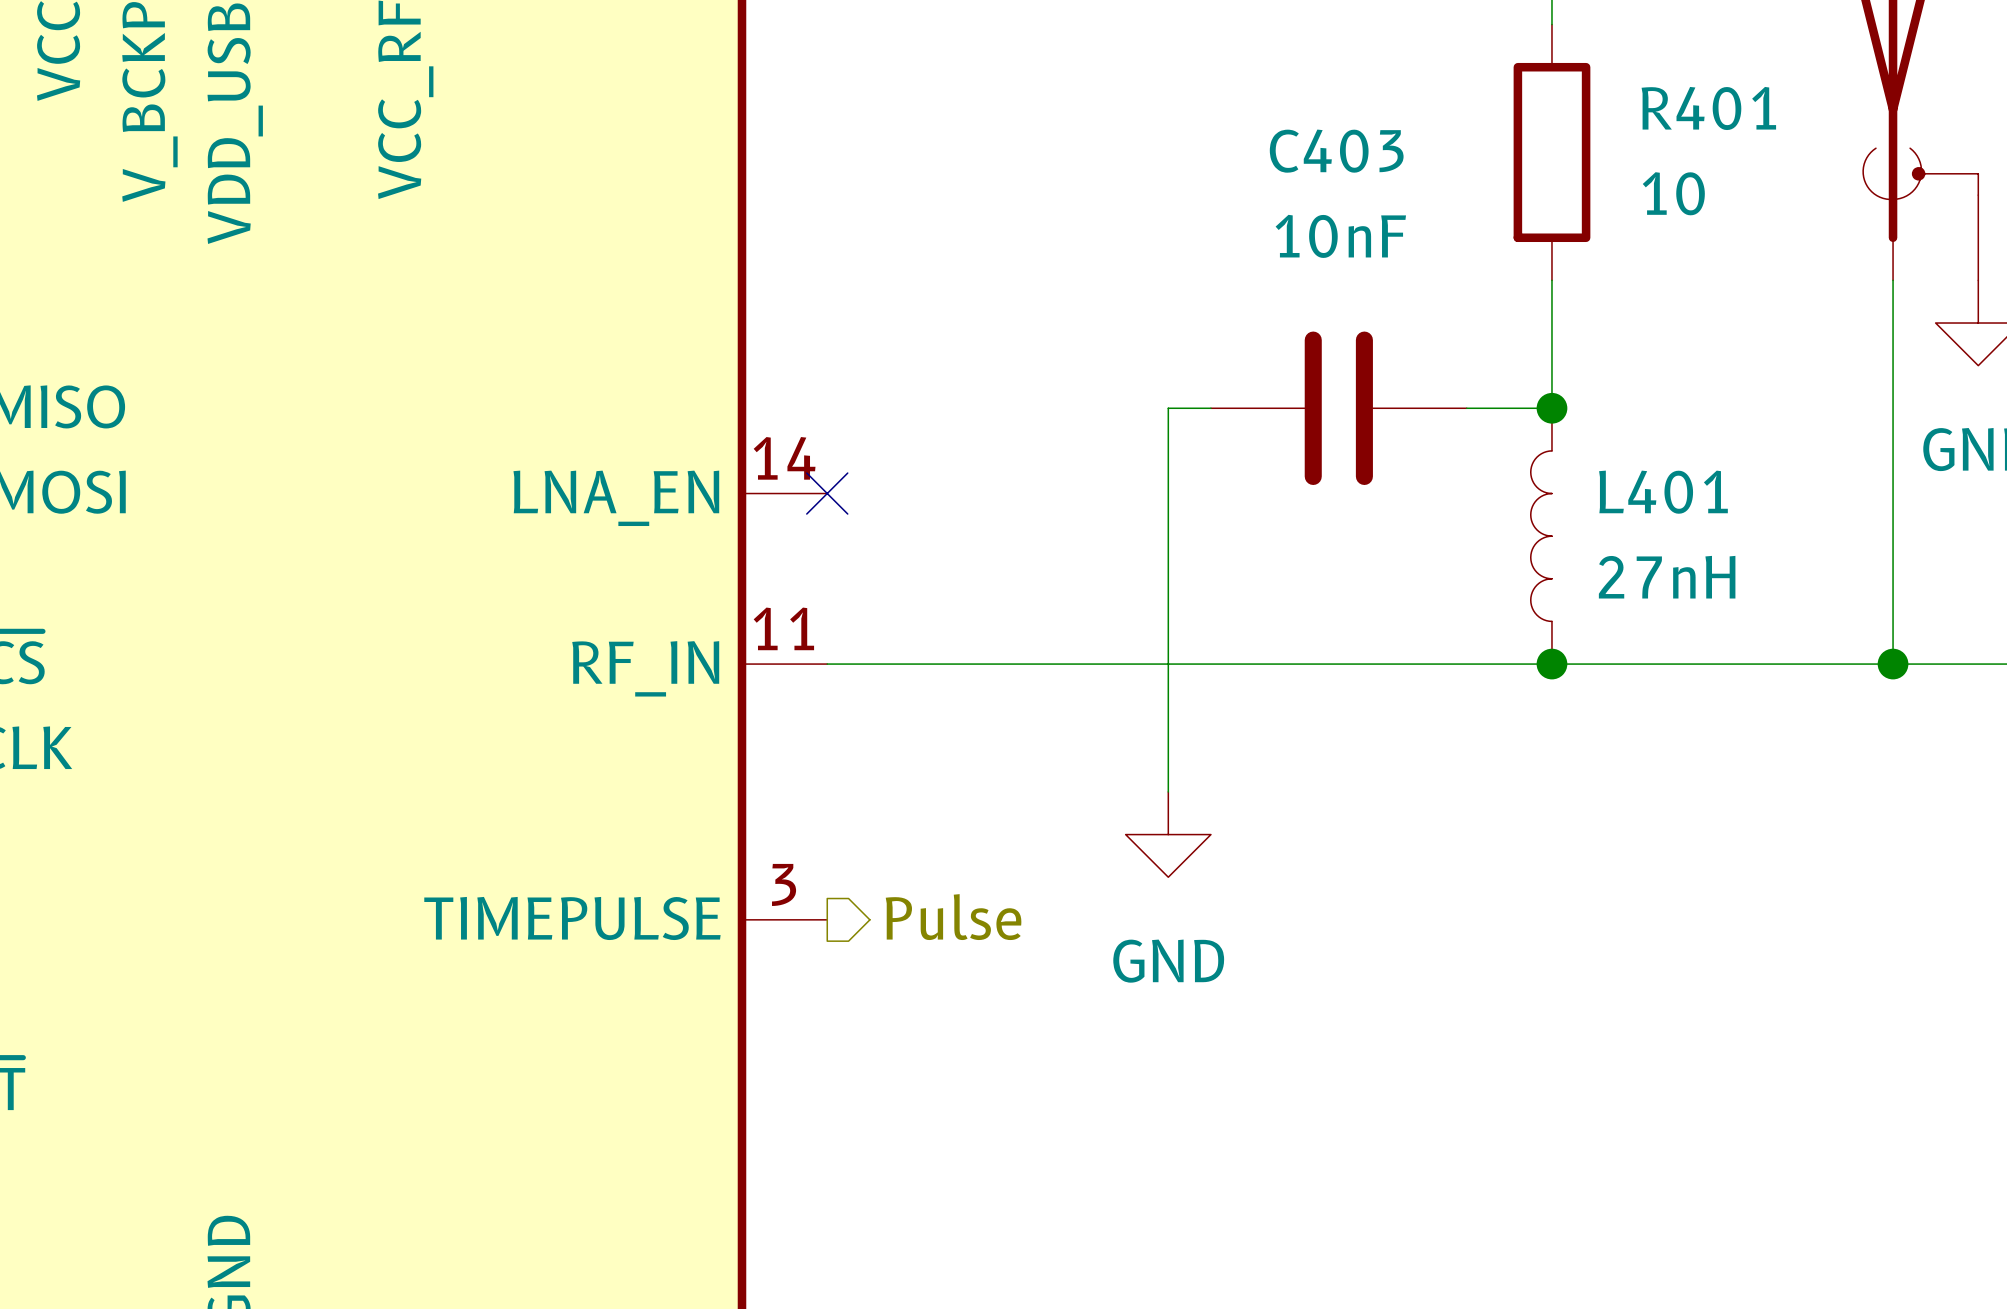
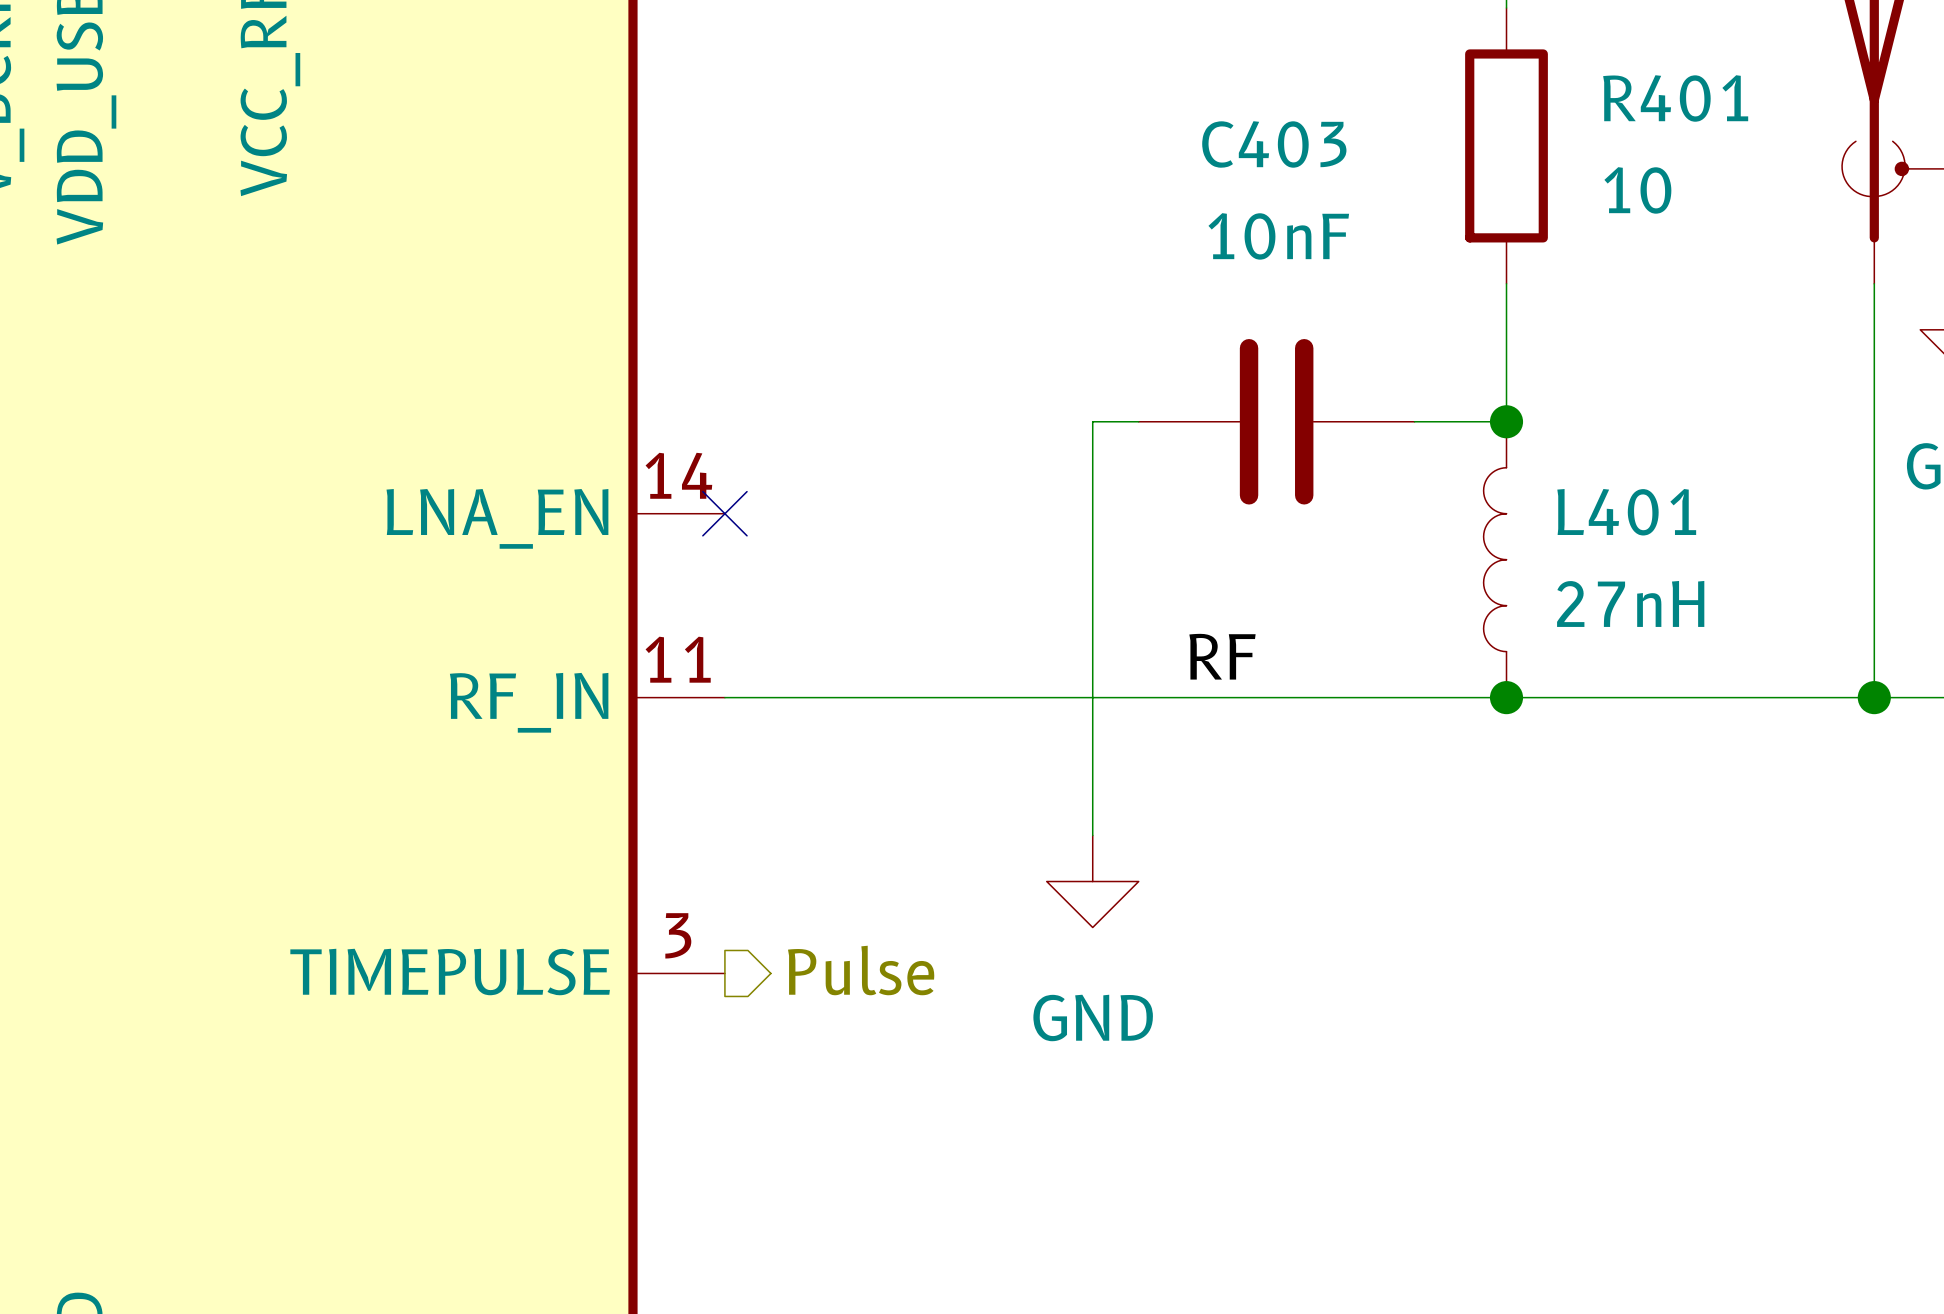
label: none -> RF (1222, 656)

